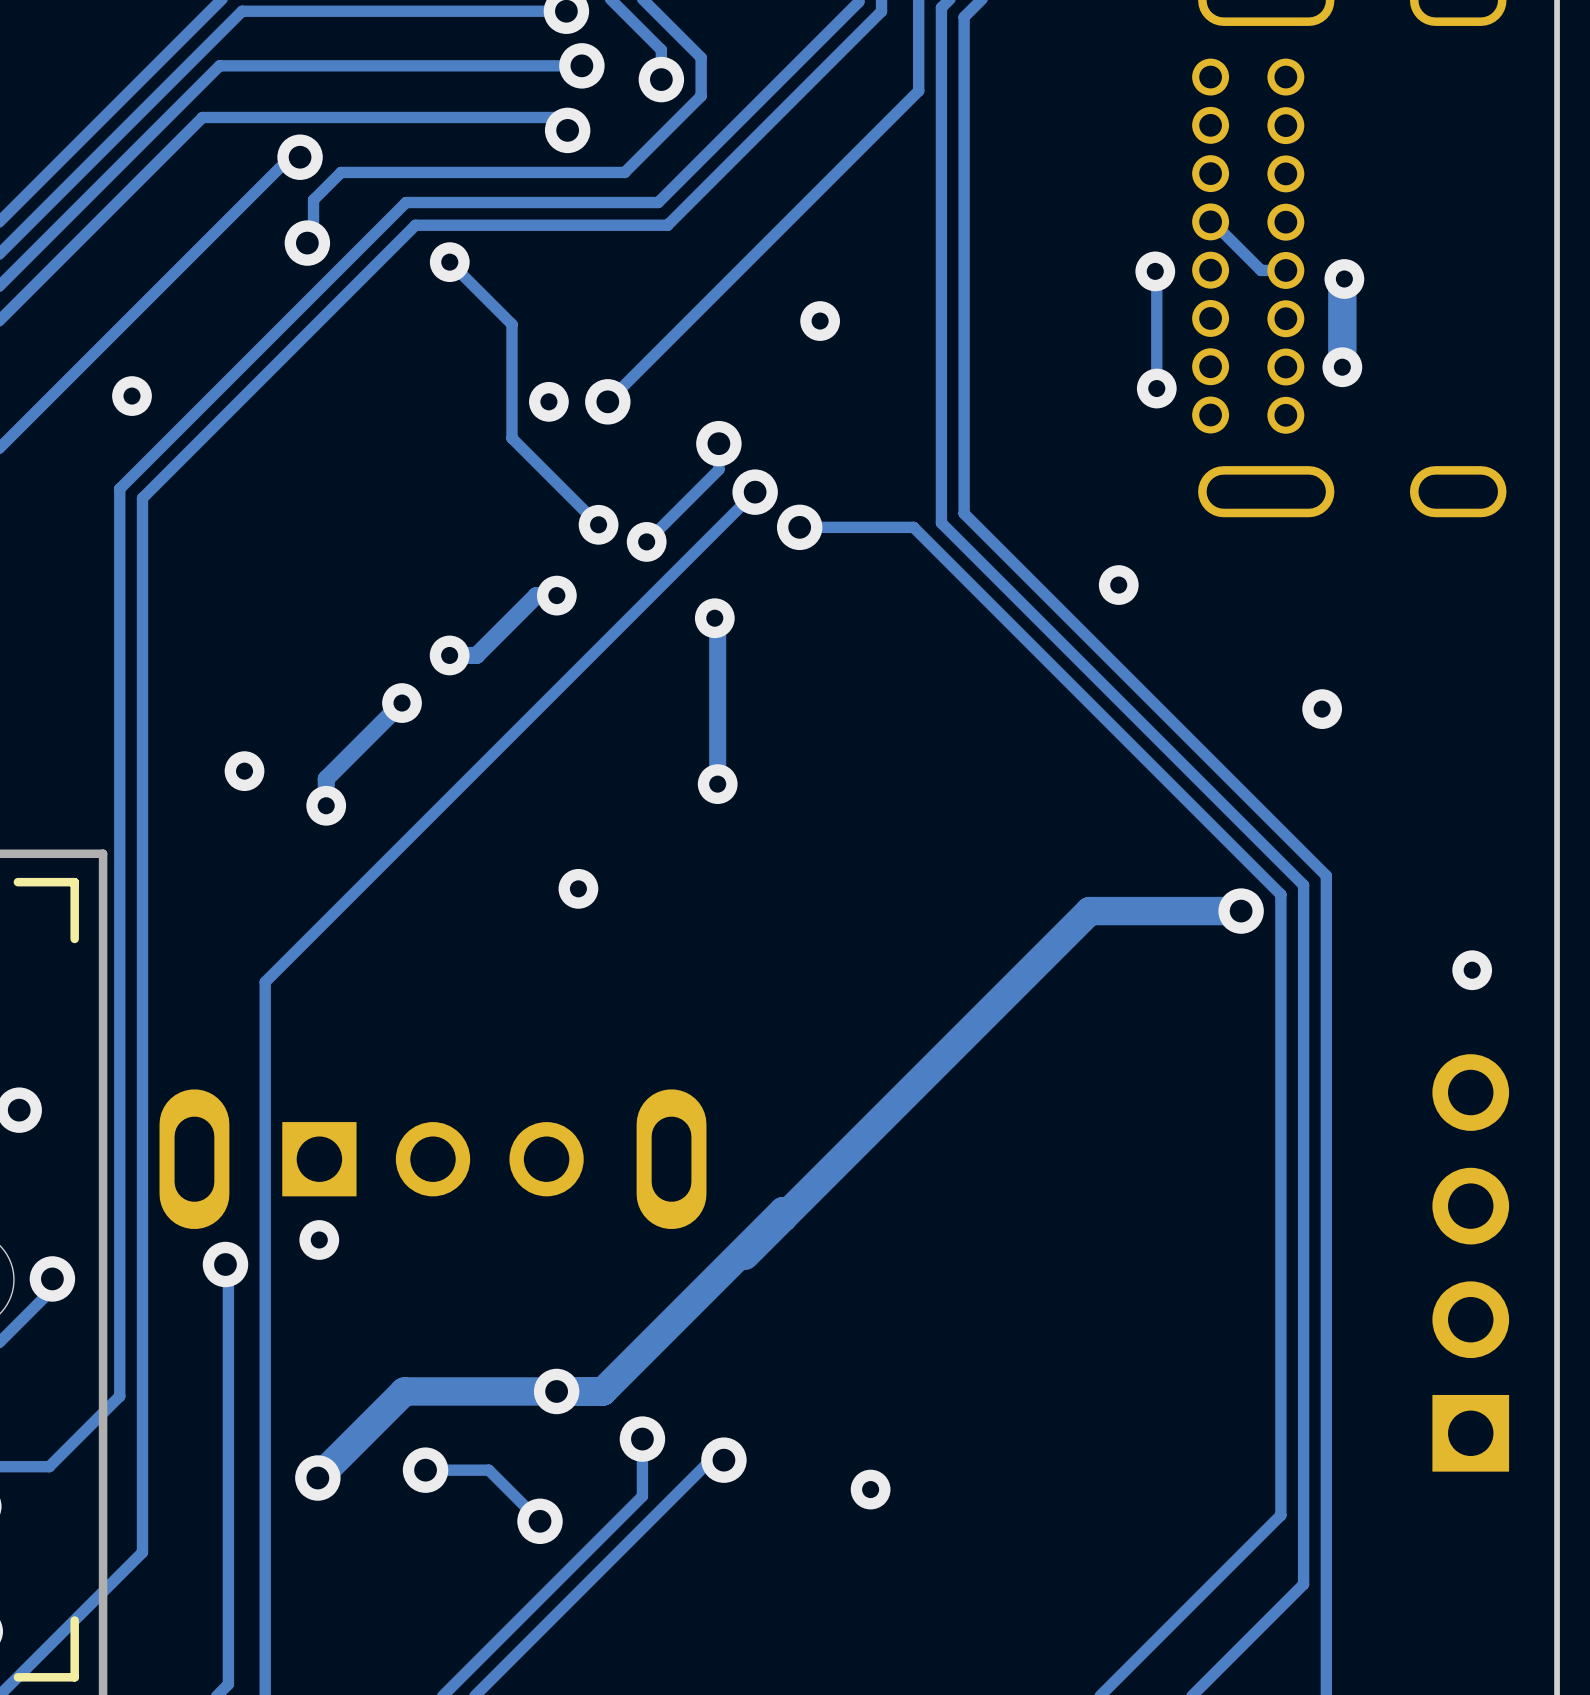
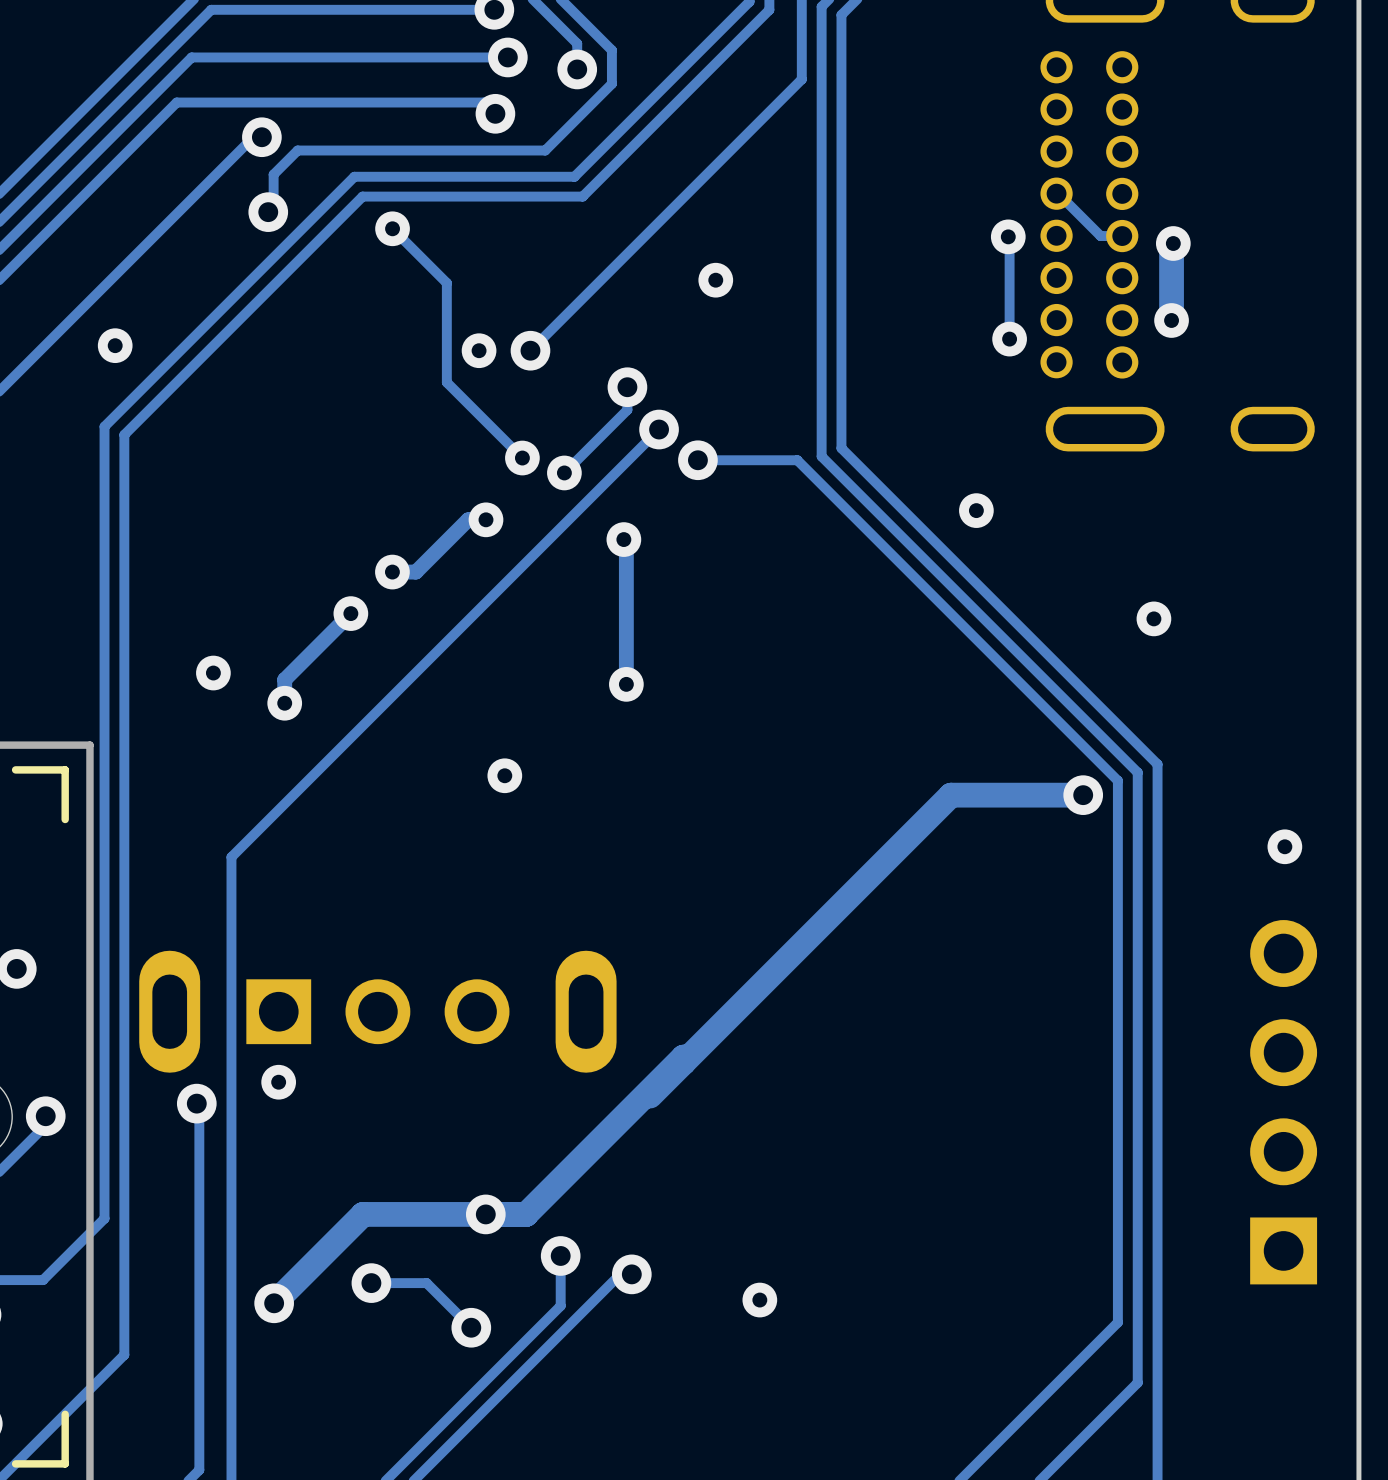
track: (415, 1391) (404, 1391) (317, 1478) -> (363, 1214) (274, 1303)
via position: (317, 1478) -> (274, 1303)

